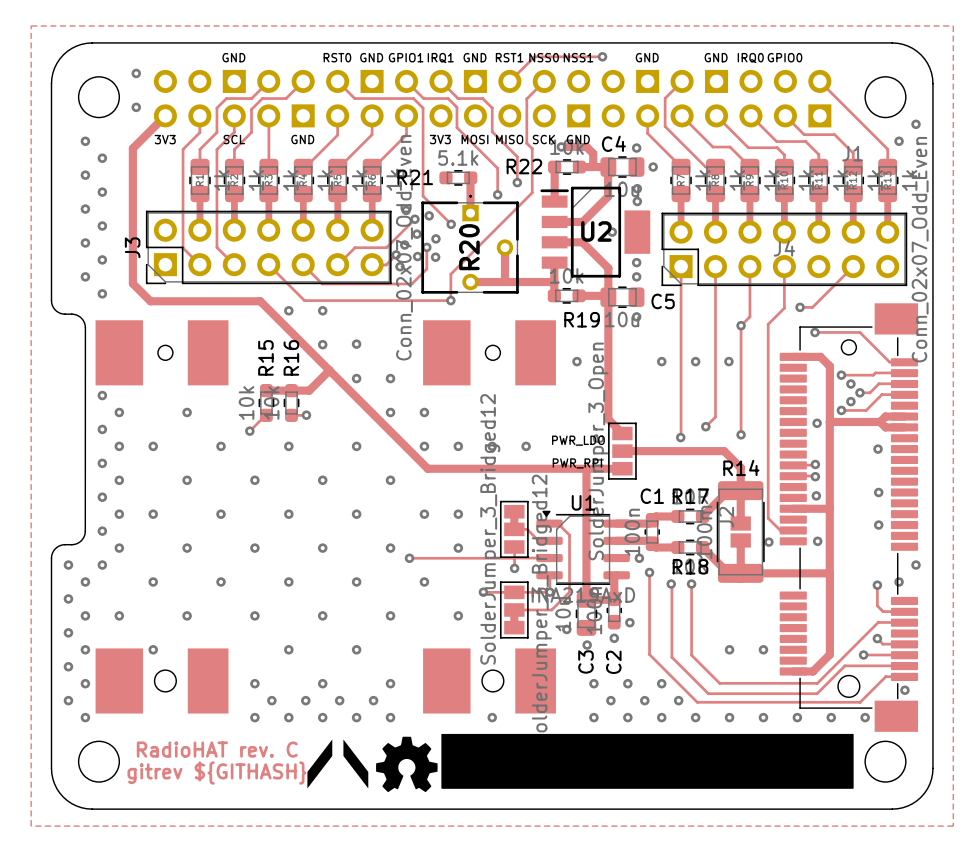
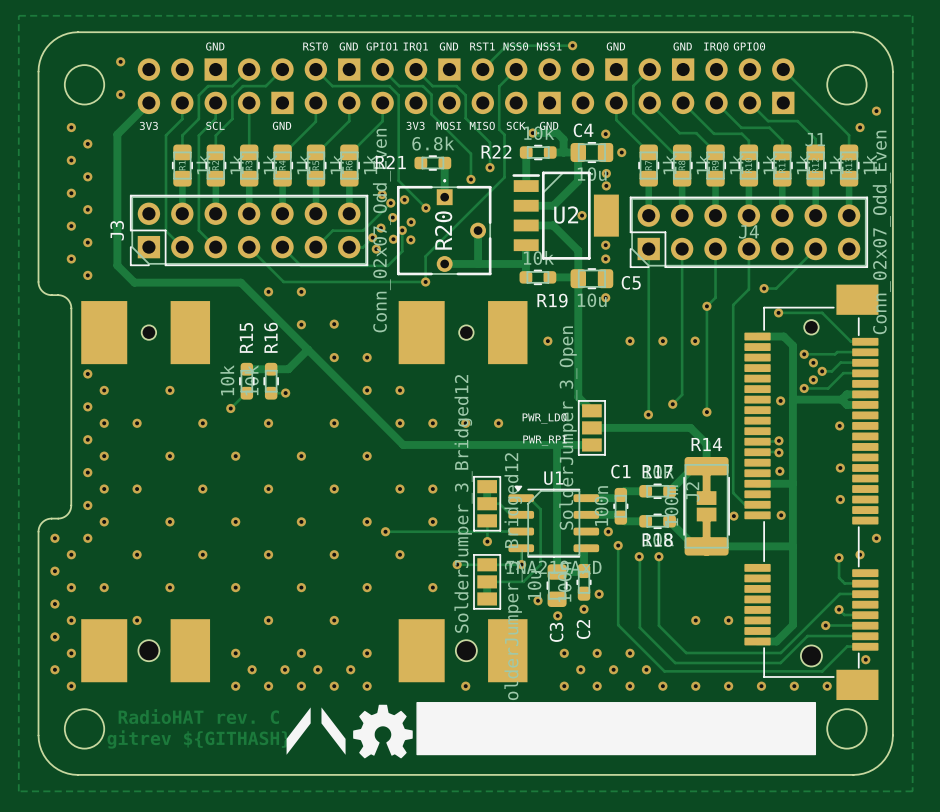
R21 value: 5.1k (458, 157) -> 6.8k (433, 143)

